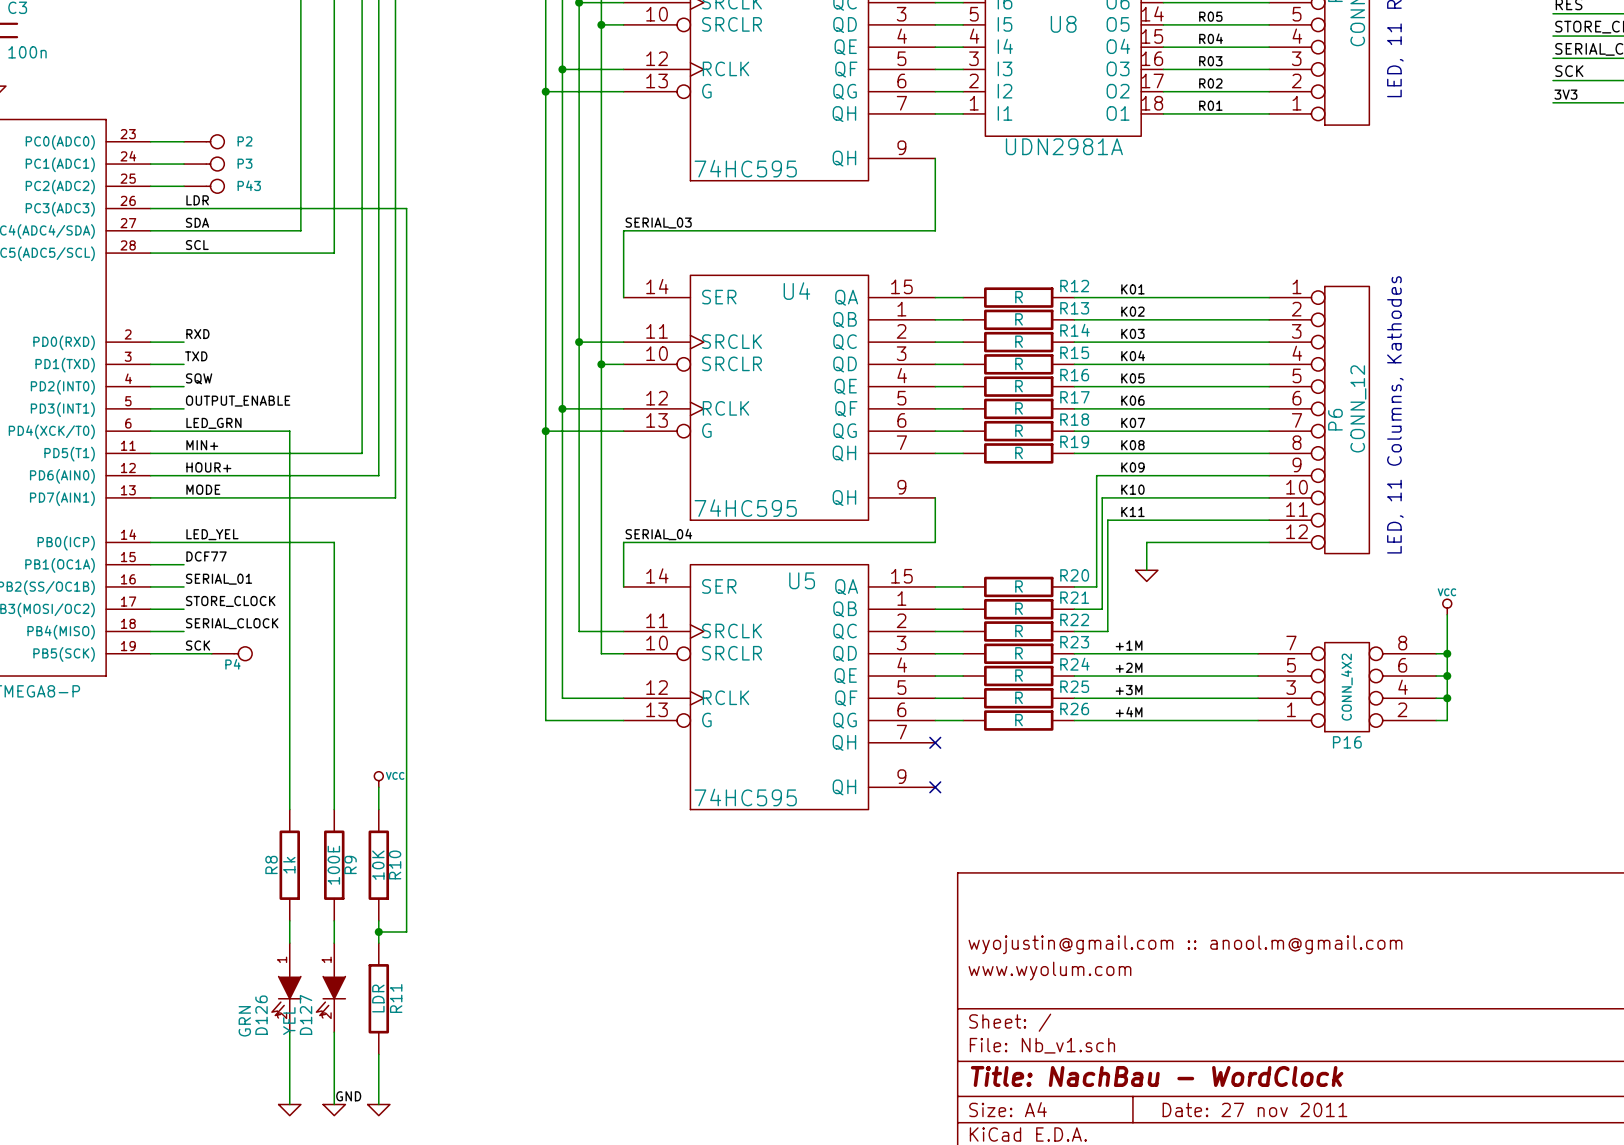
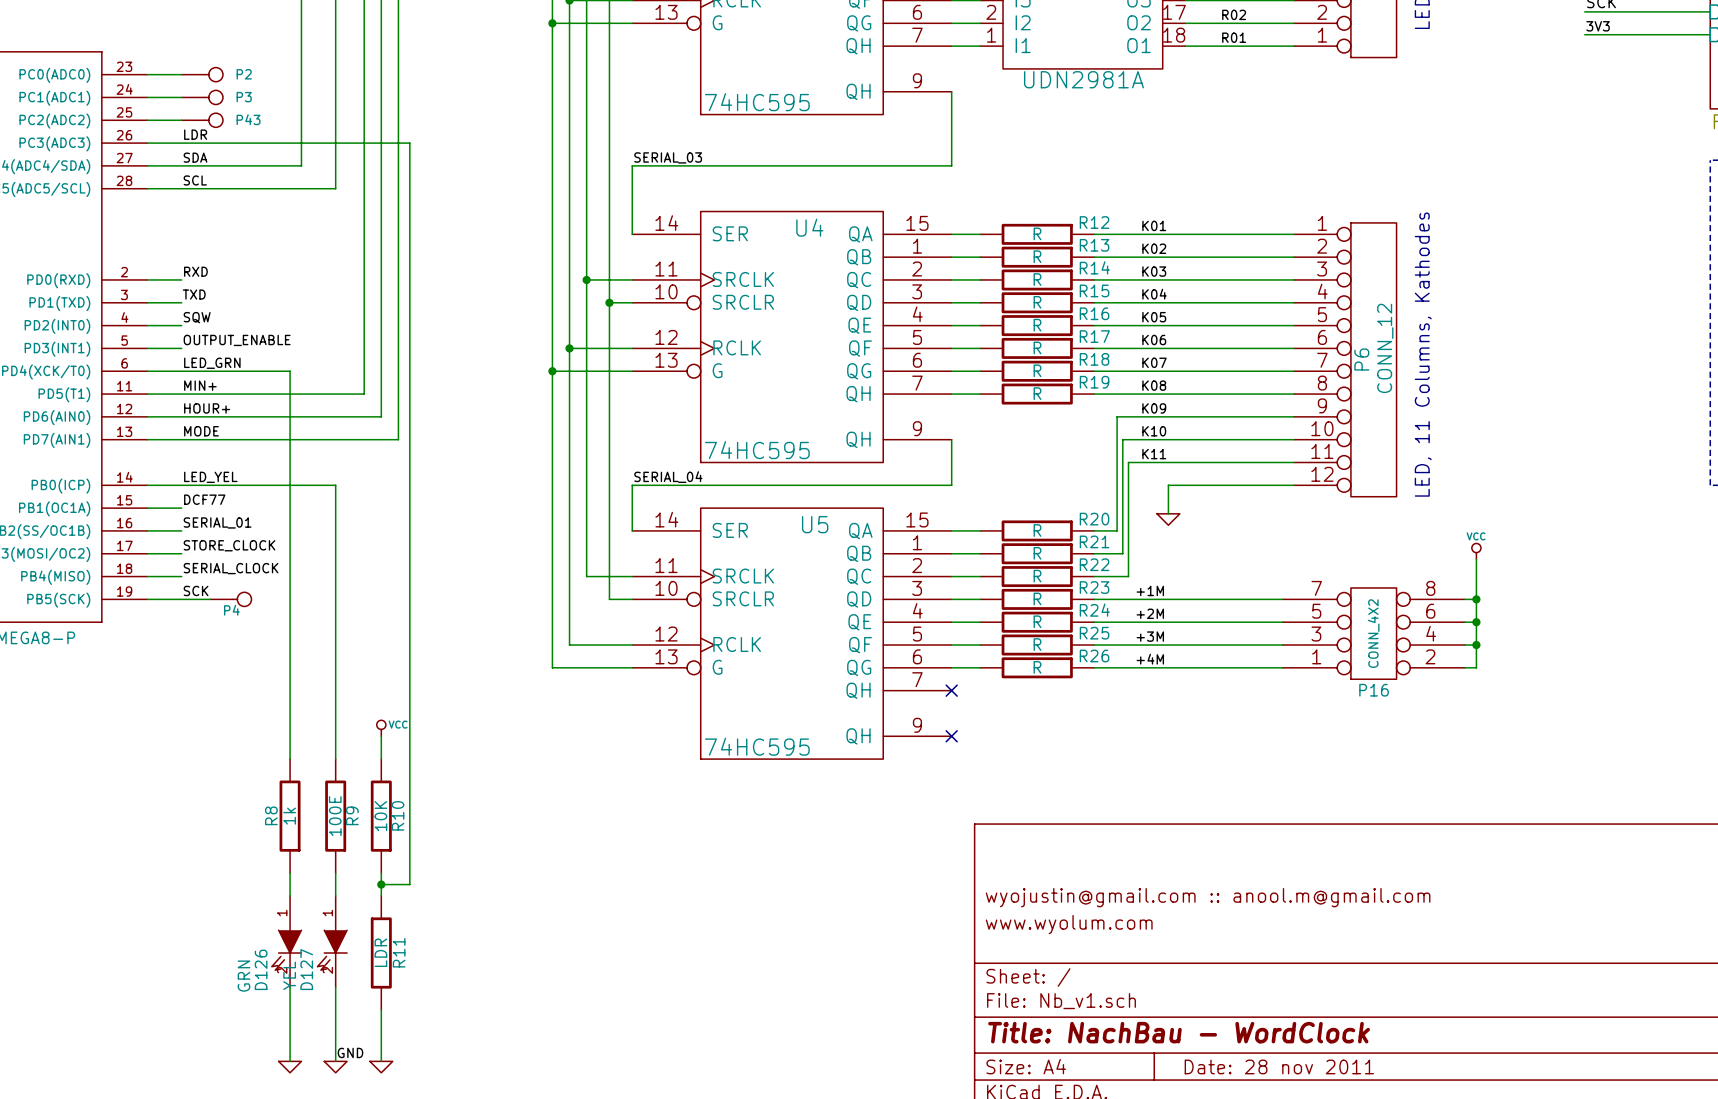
title block: Date: 27 nov 2011 (1254, 1109) -> Date: 28 nov 2011 (1279, 1066)

